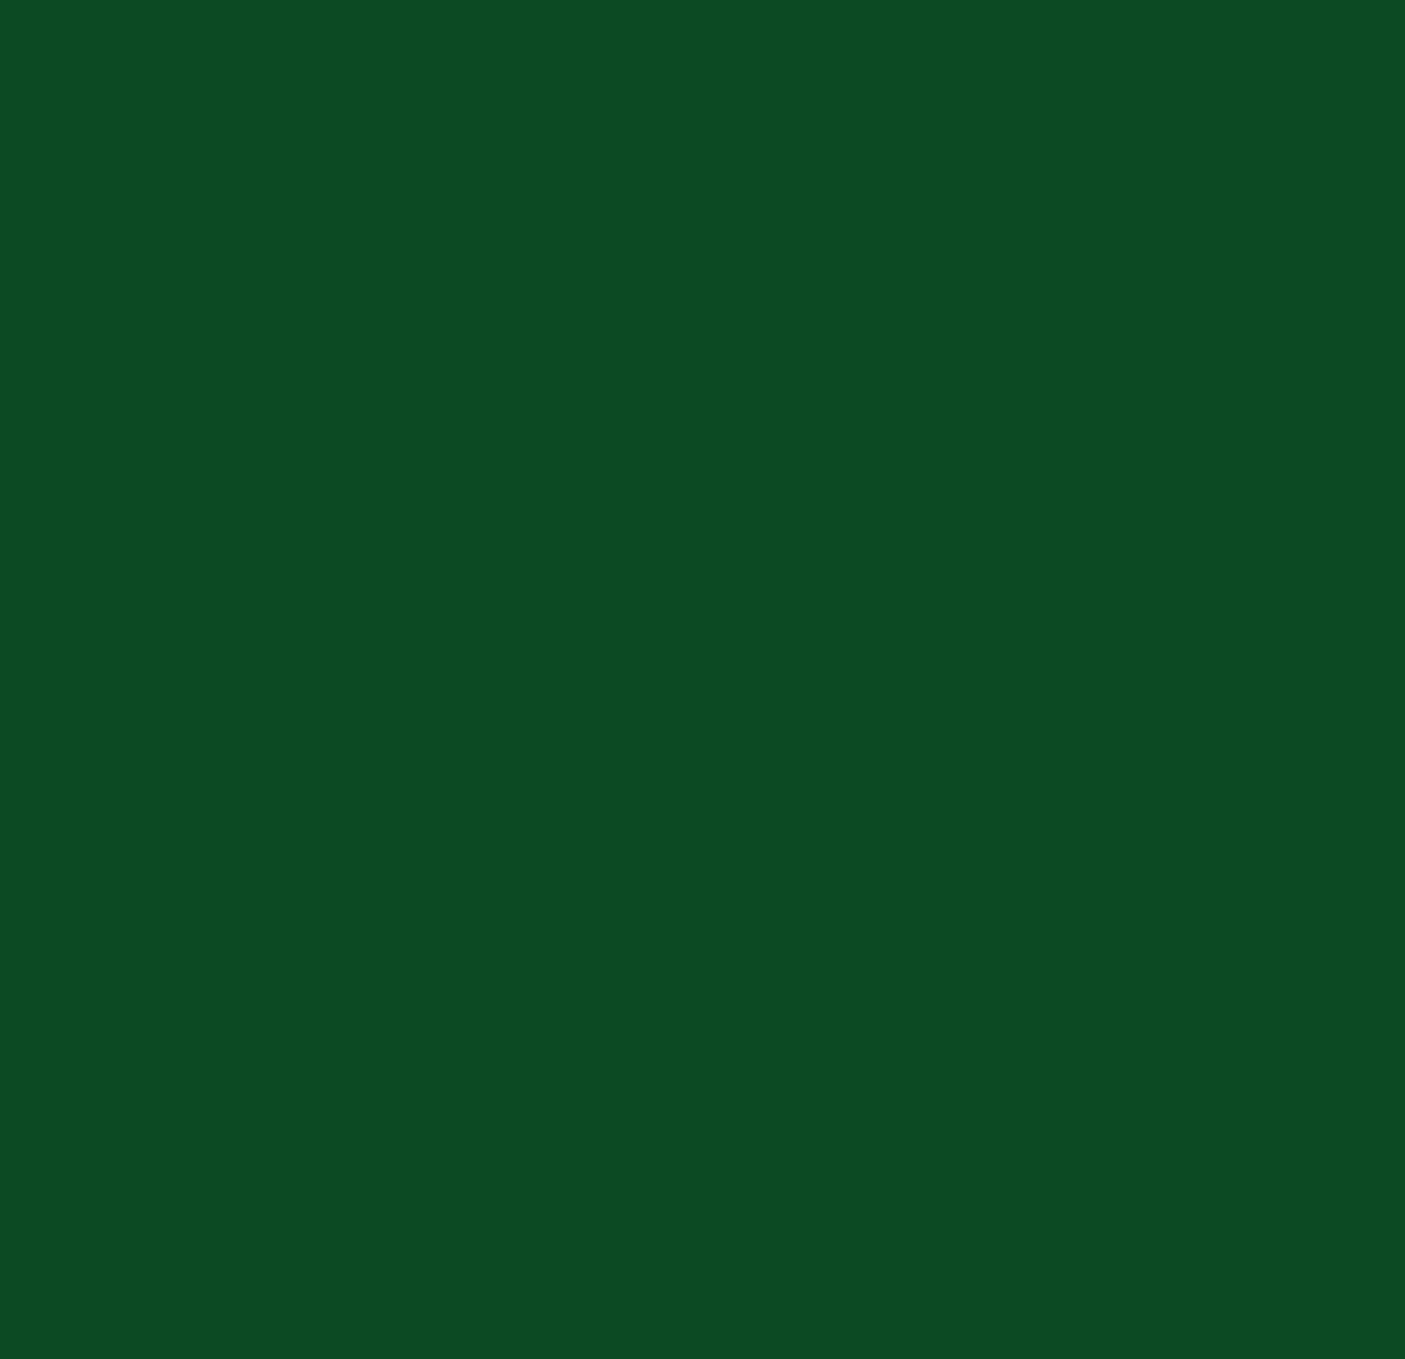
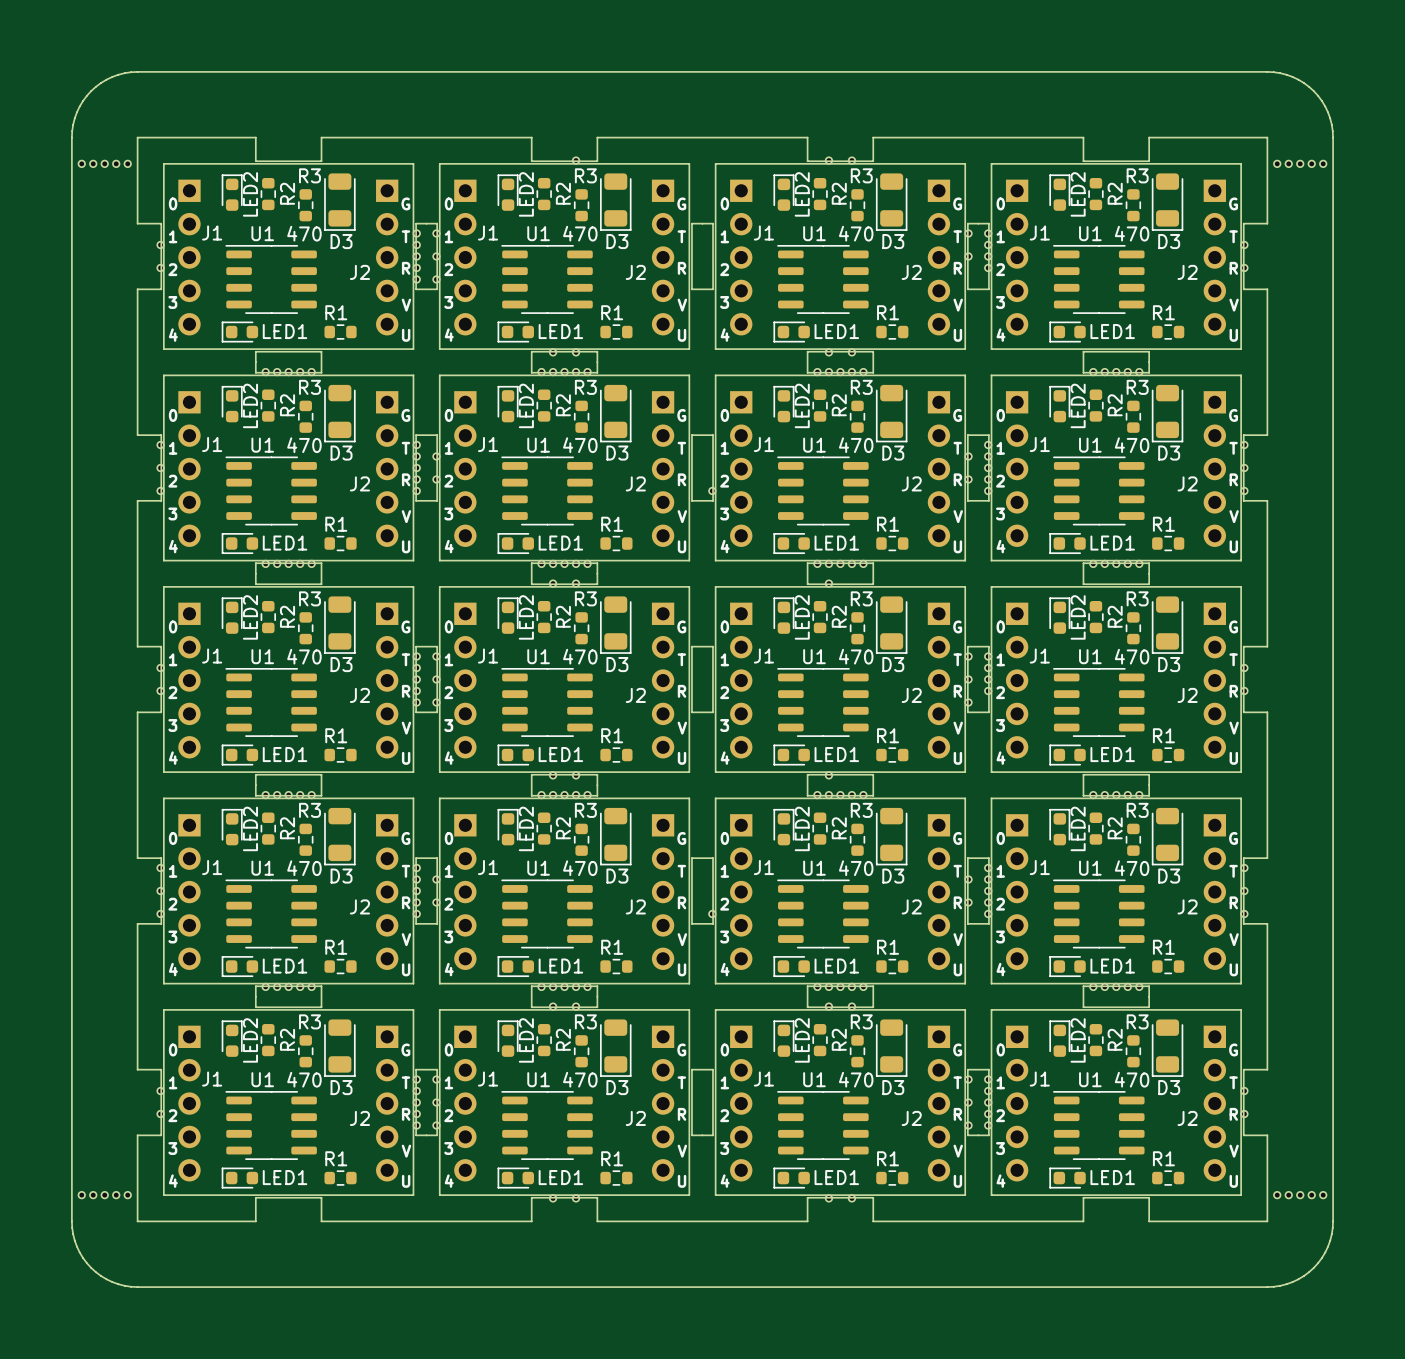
board edge: none -> (137, 71) (1267, 71) (1292, 76) (1313, 91) (1328, 112) (1333, 137) (1333, 1221) (1328, 1246) (1313, 1267) (1292, 1282) (1267, 1287) (137, 1287) (112, 1282) (91, 1267) (76, 1246) (71, 1221) (71, 137) (76, 112) (91, 91) (112, 76) (137, 71)
board edge: none -> (137, 137) (137, 223) (161, 223) (161, 289) (137, 289) (137, 435) (161, 435) (161, 500) (137, 500) (137, 646) (161, 646) (161, 712) (137, 712) (137, 858) (161, 858) (161, 923) (137, 923) (137, 1069) (161, 1069) (161, 1135) (137, 1135) (137, 1221) (255, 1221) (255, 1197) (321, 1197) (321, 1221) (531, 1221) (531, 1197) (597, 1197) (597, 1221) (807, 1221) (807, 1197) (873, 1197) (873, 1221) (1083, 1221) (1083, 1197) (1149, 1197) (1149, 1221) (1267, 1221) (1267, 1135) (1243, 1135) (1243, 1069) (1267, 1069) (1267, 923) (1243, 923) (1243, 858) (1267, 858) (1267, 712) (1243, 712) (1243, 646) (1267, 646) (1267, 500) (1243, 500) (1243, 435) (1267, 435) (1267, 289) (1243, 289) (1243, 223) (1267, 223) (1267, 137) (1149, 137) (1149, 161) (1083, 161) (1083, 137) (873, 137) (873, 161) (807, 161) (807, 137) (597, 137) (597, 161) (531, 161) (531, 137) (321, 137) (321, 161) (255, 161) (255, 137) (137, 137)
part: none -> (576, 160)
part: none -> (828, 160)
part: none -> (851, 160)
part: none -> (81, 163)
part: none -> (93, 163)
part: none -> (104, 163)
part: none -> (116, 163)
part: none -> (127, 163)
board edge: none -> (163, 163) (413, 163) (413, 349) (163, 349) (163, 163)
board edge: none -> (439, 163) (439, 349) (689, 349) (689, 163) (439, 163)
board edge: none -> (715, 163) (965, 163) (965, 349) (715, 349) (715, 163)
board edge: none -> (991, 163) (991, 349) (1241, 349) (1241, 163) (991, 163)
part: none -> (1277, 163)
part: none -> (1288, 163)
part: none -> (1300, 163)
part: none -> (1311, 163)
part: none -> (1323, 163)
LED2: none -> (232, 192)
LED2: none -> (508, 192)
LED2: none -> (783, 192)
LED2: none -> (1059, 192)
R2: none -> (268, 194)
R2: none -> (544, 194)
R2: none -> (820, 194)
R2: none -> (1095, 194)
D3: none -> (339, 202)
D3: none -> (615, 202)
D3: none -> (891, 202)
D3: none -> (1167, 202)
text: none -> 0 (173, 203)
text: none -> G (405, 203)
text: none -> 0 (448, 203)
text: none -> G (681, 203)
text: none -> 0 (724, 203)
text: none -> G (957, 203)
text: none -> 0 (1000, 203)
text: none -> G (1233, 203)
470: none -> R3 (305, 205)
470: none -> R3 (581, 205)
470: none -> R3 (857, 205)
470: none -> R3 (1133, 205)
board edge: none -> (416, 223) (437, 223) (437, 289) (416, 289) (416, 223)
board edge: none -> (691, 223) (713, 223) (713, 289) (691, 289) (691, 223)
board edge: none -> (967, 223) (988, 223) (988, 289) (967, 289) (967, 223)
part: none -> (416, 233)
part: none -> (436, 233)
part: none -> (968, 233)
part: none -> (988, 233)
text: none -> 1 (173, 236)
text: none -> T (405, 236)
text: none -> 1 (448, 236)
text: none -> T (681, 236)
text: none -> 1 (724, 236)
text: none -> T (957, 236)
text: none -> 1 (1000, 236)
text: none -> T (1233, 236)
part: none -> (160, 244)
part: none -> (416, 244)
part: none -> (988, 244)
part: none -> (1244, 244)
part: none -> (416, 256)
part: none -> (436, 256)
part: none -> (968, 256)
part: none -> (988, 256)
J1: none -> (189, 257)
J2: none -> (387, 257)
J1: none -> (465, 257)
J2: none -> (663, 257)
J1: none -> (741, 257)
J2: none -> (938, 257)
J1: none -> (1017, 257)
J2: none -> (1214, 257)
part: none -> (160, 267)
part: none -> (416, 267)
part: none -> (988, 267)
part: none -> (1244, 267)
text: none -> R (406, 268)
text: none -> R (682, 268)
text: none -> R (957, 268)
text: none -> R (1233, 268)
text: none -> 2 (172, 269)
text: none -> 2 (448, 269)
text: none -> 2 (724, 269)
text: none -> 2 (1000, 269)
U1: none -> (271, 279)
part: none -> (416, 279)
part: none -> (436, 279)
U1: none -> (547, 279)
U1: none -> (822, 279)
U1: none -> (1098, 279)
text: none -> 3 (172, 302)
text: none -> 3 (448, 302)
text: none -> 3 (724, 302)
text: none -> 3 (1000, 302)
text: none -> V (406, 305)
text: none -> V (682, 305)
text: none -> V (958, 305)
text: none -> V (1234, 305)
LED1: none -> (239, 332)
R1: none -> (340, 332)
LED1: none -> (515, 332)
R1: none -> (616, 332)
LED1: none -> (791, 332)
R1: none -> (892, 332)
LED1: none -> (1067, 332)
R1: none -> (1168, 332)
text: none -> 4 (173, 335)
text: none -> U (406, 335)
text: none -> 4 (449, 335)
text: none -> U (682, 335)
text: none -> 4 (725, 335)
text: none -> U (957, 335)
text: none -> 4 (1001, 335)
text: none -> U (1233, 335)
board edge: none -> (255, 351) (255, 372) (321, 372) (321, 351) (255, 351)
board edge: none -> (531, 351) (531, 372) (597, 372) (597, 351) (531, 351)
board edge: none -> (807, 351) (807, 372) (873, 372) (873, 351) (807, 351)
board edge: none -> (1083, 351) (1083, 372) (1149, 372) (1149, 351) (1083, 351)
part: none -> (553, 352)
part: none -> (576, 352)
part: none -> (828, 352)
part: none -> (851, 352)
part: none -> (265, 372)
part: none -> (277, 372)
part: none -> (288, 372)
part: none -> (300, 372)
part: none -> (311, 372)
part: none -> (541, 372)
part: none -> (553, 372)
part: none -> (564, 372)
part: none -> (576, 372)
part: none -> (587, 372)
part: none -> (817, 372)
part: none -> (828, 372)
part: none -> (840, 372)
part: none -> (851, 372)
part: none -> (863, 372)
part: none -> (1093, 372)
part: none -> (1104, 372)
part: none -> (1116, 372)
part: none -> (1127, 372)
part: none -> (1139, 372)
board edge: none -> (163, 375) (413, 375) (413, 560) (163, 560) (163, 375)
board edge: none -> (439, 375) (439, 560) (689, 560) (689, 375) (439, 375)
board edge: none -> (715, 375) (965, 375) (965, 560) (715, 560) (715, 375)
board edge: none -> (991, 375) (991, 560) (1241, 560) (1241, 375) (991, 375)
LED2: none -> (232, 404)
LED2: none -> (508, 404)
LED2: none -> (783, 404)
LED2: none -> (1059, 404)
R2: none -> (268, 405)
R2: none -> (544, 405)
R2: none -> (820, 405)
R2: none -> (1095, 405)
D3: none -> (339, 413)
D3: none -> (615, 413)
D3: none -> (891, 413)
D3: none -> (1167, 413)
text: none -> 0 (173, 415)
text: none -> G (405, 415)
text: none -> 0 (448, 415)
text: none -> G (681, 415)
text: none -> 0 (724, 415)
text: none -> G (957, 415)
text: none -> 0 (1000, 415)
text: none -> G (1233, 415)
470: none -> R3 (305, 416)
470: none -> R3 (581, 416)
470: none -> R3 (857, 416)
470: none -> R3 (1133, 416)
board edge: none -> (416, 435) (416, 500) (437, 500) (437, 435) (416, 435)
board edge: none -> (691, 435) (691, 500) (713, 500) (713, 435) (691, 435)
board edge: none -> (967, 435) (988, 435) (988, 500) (967, 500) (967, 435)
part: none -> (160, 444)
part: none -> (416, 444)
part: none -> (988, 444)
part: none -> (1244, 444)
text: none -> 1 (173, 448)
text: none -> T (405, 448)
text: none -> 1 (448, 448)
text: none -> T (681, 448)
text: none -> 1 (724, 448)
text: none -> T (957, 448)
text: none -> 1 (1000, 448)
text: none -> T (1233, 448)
part: none -> (416, 456)
part: none -> (436, 456)
part: none -> (968, 456)
part: none -> (988, 456)
part: none -> (160, 467)
part: none -> (416, 467)
part: none -> (988, 467)
part: none -> (1244, 467)
J1: none -> (189, 469)
J2: none -> (387, 469)
J1: none -> (465, 469)
J2: none -> (663, 469)
J1: none -> (741, 469)
J2: none -> (938, 469)
J1: none -> (1017, 469)
J2: none -> (1214, 469)
text: none -> R (406, 479)
part: none -> (416, 479)
part: none -> (436, 479)
text: none -> R (682, 479)
text: none -> R (957, 479)
part: none -> (968, 479)
part: none -> (988, 479)
text: none -> R (1233, 479)
text: none -> 2 (172, 481)
text: none -> 2 (448, 481)
text: none -> 2 (724, 481)
text: none -> 2 (1000, 481)
part: none -> (160, 490)
U1: none -> (271, 490)
part: none -> (416, 490)
U1: none -> (547, 490)
part: none -> (712, 490)
U1: none -> (822, 490)
part: none -> (988, 490)
U1: none -> (1098, 490)
part: none -> (1244, 490)
text: none -> 3 (172, 513)
text: none -> 3 (448, 513)
text: none -> 3 (724, 513)
text: none -> 3 (1000, 513)
text: none -> V (406, 516)
text: none -> V (682, 516)
text: none -> V (958, 516)
text: none -> V (1234, 516)
LED1: none -> (239, 543)
R1: none -> (340, 543)
LED1: none -> (515, 543)
R1: none -> (616, 543)
LED1: none -> (791, 543)
R1: none -> (892, 543)
LED1: none -> (1067, 543)
R1: none -> (1168, 543)
text: none -> 4 (173, 546)
text: none -> U (406, 546)
text: none -> 4 (449, 546)
text: none -> U (682, 546)
text: none -> 4 (725, 546)
text: none -> U (957, 546)
text: none -> 4 (1001, 546)
text: none -> U (1233, 546)
board edge: none -> (255, 563) (255, 584) (321, 584) (321, 563) (255, 563)
part: none -> (265, 563)
part: none -> (277, 563)
part: none -> (288, 563)
part: none -> (300, 563)
part: none -> (311, 563)
board edge: none -> (531, 563) (531, 584) (597, 584) (597, 563) (531, 563)
part: none -> (541, 563)
part: none -> (553, 563)
part: none -> (564, 563)
part: none -> (576, 563)
part: none -> (587, 563)
board edge: none -> (807, 563) (807, 584) (873, 584) (873, 563) (807, 563)
part: none -> (817, 563)
part: none -> (828, 563)
part: none -> (840, 563)
part: none -> (851, 563)
part: none -> (863, 563)
board edge: none -> (1083, 563) (1083, 584) (1149, 584) (1149, 563) (1083, 563)
part: none -> (1093, 563)
part: none -> (1104, 563)
part: none -> (1116, 563)
part: none -> (1127, 563)
part: none -> (1139, 563)
part: none -> (553, 583)
part: none -> (576, 583)
part: none -> (828, 583)
board edge: none -> (163, 586) (413, 586) (413, 772) (163, 772) (163, 586)
board edge: none -> (439, 586) (689, 586) (689, 772) (439, 772) (439, 586)
board edge: none -> (715, 586) (965, 586) (965, 772) (715, 772) (715, 586)
board edge: none -> (991, 586) (1241, 586) (1241, 772) (991, 772) (991, 586)
LED2: none -> (232, 615)
LED2: none -> (508, 615)
LED2: none -> (783, 615)
LED2: none -> (1059, 615)
R2: none -> (268, 617)
R2: none -> (544, 617)
R2: none -> (820, 617)
R2: none -> (1095, 617)
D3: none -> (339, 625)
D3: none -> (615, 625)
D3: none -> (891, 625)
D3: none -> (1167, 625)
text: none -> 0 (173, 626)
text: none -> G (405, 626)
text: none -> 0 (448, 626)
text: none -> G (681, 626)
text: none -> 0 (724, 626)
text: none -> G (957, 626)
text: none -> 0 (1000, 626)
text: none -> G (1233, 626)
470: none -> R3 (305, 628)
470: none -> R3 (581, 628)
470: none -> R3 (857, 628)
470: none -> R3 (1133, 628)
board edge: none -> (416, 646) (437, 646) (437, 712) (416, 712) (416, 646)
board edge: none -> (691, 646) (691, 712) (712, 712) (712, 646) (691, 646)
board edge: none -> (967, 646) (988, 646) (988, 712) (967, 712) (967, 646)
part: none -> (416, 656)
part: none -> (436, 656)
part: none -> (968, 656)
part: none -> (988, 656)
text: none -> 1 (173, 659)
text: none -> T (405, 659)
text: none -> 1 (448, 659)
text: none -> T (681, 659)
text: none -> 1 (724, 659)
text: none -> T (957, 659)
text: none -> 1 (1000, 659)
text: none -> T (1233, 659)
part: none -> (160, 668)
part: none -> (416, 668)
part: none -> (988, 668)
part: none -> (1244, 668)
part: none -> (416, 679)
part: none -> (436, 679)
part: none -> (968, 679)
part: none -> (988, 679)
J1: none -> (189, 680)
J2: none -> (387, 680)
J1: none -> (465, 680)
J2: none -> (663, 680)
J1: none -> (741, 680)
J2: none -> (938, 680)
J1: none -> (1017, 680)
J2: none -> (1214, 680)
part: none -> (160, 690)
part: none -> (416, 690)
part: none -> (988, 690)
part: none -> (1244, 690)
text: none -> R (406, 691)
text: none -> R (682, 691)
text: none -> R (957, 691)
text: none -> R (1233, 691)
text: none -> 2 (172, 692)
text: none -> 2 (448, 692)
text: none -> 2 (724, 692)
text: none -> 2 (1000, 692)
U1: none -> (271, 702)
part: none -> (416, 702)
part: none -> (436, 702)
U1: none -> (547, 702)
U1: none -> (822, 702)
part: none -> (968, 702)
U1: none -> (1098, 702)
text: none -> 3 (172, 725)
text: none -> 3 (448, 725)
text: none -> 3 (724, 725)
text: none -> 3 (1000, 725)
text: none -> V (406, 728)
text: none -> V (682, 728)
text: none -> V (958, 728)
text: none -> V (1234, 728)
LED1: none -> (239, 755)
R1: none -> (340, 755)
LED1: none -> (515, 755)
R1: none -> (616, 755)
LED1: none -> (791, 755)
R1: none -> (892, 755)
LED1: none -> (1067, 755)
R1: none -> (1168, 755)
text: none -> 4 (173, 758)
text: none -> U (406, 758)
text: none -> 4 (449, 758)
text: none -> U (682, 758)
text: none -> 4 (725, 758)
text: none -> U (957, 758)
text: none -> 4 (1001, 758)
text: none -> U (1233, 758)
board edge: none -> (255, 774) (255, 795) (321, 795) (321, 774) (255, 774)
board edge: none -> (531, 774) (531, 795) (597, 795) (597, 774) (531, 774)
board edge: none -> (807, 774) (873, 774) (873, 795) (807, 795) (807, 774)
board edge: none -> (1083, 774) (1149, 774) (1149, 795) (1083, 795) (1083, 774)
part: none -> (553, 775)
part: none -> (576, 775)
part: none -> (828, 775)
part: none -> (265, 795)
part: none -> (277, 795)
part: none -> (288, 795)
part: none -> (300, 795)
part: none -> (311, 795)
part: none -> (541, 795)
part: none -> (553, 795)
part: none -> (564, 795)
part: none -> (576, 795)
part: none -> (587, 795)
part: none -> (817, 795)
part: none -> (828, 795)
part: none -> (840, 795)
part: none -> (851, 795)
part: none -> (863, 795)
part: none -> (1093, 795)
part: none -> (1104, 795)
part: none -> (1116, 795)
part: none -> (1127, 795)
part: none -> (1139, 795)
board edge: none -> (163, 798) (413, 798) (413, 983) (163, 983) (163, 798)
board edge: none -> (439, 798) (439, 983) (689, 983) (689, 798) (439, 798)
board edge: none -> (715, 798) (965, 798) (965, 983) (715, 983) (715, 798)
board edge: none -> (991, 798) (991, 983) (1241, 983) (1241, 798) (991, 798)
LED2: none -> (232, 827)
LED2: none -> (508, 827)
LED2: none -> (783, 827)
LED2: none -> (1059, 827)
R2: none -> (268, 828)
R2: none -> (544, 828)
R2: none -> (820, 828)
R2: none -> (1095, 828)
D3: none -> (339, 836)
D3: none -> (615, 836)
D3: none -> (891, 836)
D3: none -> (1167, 836)
text: none -> 0 (173, 838)
text: none -> G (405, 838)
text: none -> 0 (448, 838)
text: none -> G (681, 838)
text: none -> 0 (724, 838)
text: none -> G (957, 838)
text: none -> 0 (1000, 838)
text: none -> G (1233, 838)
470: none -> R3 (305, 839)
470: none -> R3 (581, 839)
470: none -> R3 (857, 839)
470: none -> R3 (1133, 839)
board edge: none -> (416, 858) (416, 923) (437, 923) (437, 858) (416, 858)
board edge: none -> (691, 858) (691, 923) (713, 923) (713, 858) (691, 858)
board edge: none -> (967, 858) (988, 858) (988, 923) (967, 923) (967, 858)
part: none -> (160, 868)
part: none -> (416, 868)
part: none -> (988, 868)
part: none -> (1244, 868)
text: none -> 1 (173, 871)
text: none -> T (405, 871)
text: none -> 1 (448, 871)
text: none -> T (681, 871)
text: none -> 1 (724, 871)
text: none -> T (957, 871)
text: none -> 1 (1000, 871)
text: none -> T (1233, 871)
part: none -> (416, 879)
part: none -> (436, 879)
part: none -> (968, 879)
part: none -> (988, 879)
part: none -> (160, 891)
part: none -> (416, 891)
part: none -> (988, 891)
part: none -> (1244, 891)
J1: none -> (189, 892)
J2: none -> (387, 892)
J1: none -> (465, 892)
J2: none -> (663, 892)
J1: none -> (741, 892)
J2: none -> (938, 892)
J1: none -> (1017, 892)
J2: none -> (1214, 892)
text: none -> R (406, 902)
part: none -> (416, 902)
part: none -> (436, 902)
text: none -> R (682, 902)
text: none -> R (957, 902)
part: none -> (968, 902)
part: none -> (988, 902)
text: none -> R (1233, 902)
text: none -> 2 (172, 904)
text: none -> 2 (448, 904)
text: none -> 2 (724, 904)
text: none -> 2 (1000, 904)
part: none -> (160, 913)
U1: none -> (271, 913)
part: none -> (416, 913)
U1: none -> (547, 913)
part: none -> (712, 913)
U1: none -> (822, 913)
part: none -> (988, 913)
U1: none -> (1098, 913)
part: none -> (1244, 913)
text: none -> 3 (172, 937)
text: none -> 3 (448, 937)
text: none -> 3 (724, 937)
text: none -> 3 (1000, 937)
text: none -> V (406, 939)
text: none -> V (682, 939)
text: none -> V (958, 939)
text: none -> V (1234, 939)
LED1: none -> (239, 966)
R1: none -> (340, 966)
LED1: none -> (515, 966)
R1: none -> (616, 966)
LED1: none -> (791, 966)
R1: none -> (892, 966)
LED1: none -> (1067, 966)
R1: none -> (1168, 966)
text: none -> 4 (173, 969)
text: none -> U (406, 969)
text: none -> 4 (449, 969)
text: none -> U (682, 969)
text: none -> 4 (725, 969)
text: none -> U (957, 969)
text: none -> 4 (1001, 969)
text: none -> U (1233, 969)
board edge: none -> (255, 986) (255, 1007) (321, 1007) (321, 986) (255, 986)
part: none -> (265, 986)
part: none -> (277, 986)
part: none -> (288, 986)
part: none -> (300, 986)
part: none -> (311, 986)
board edge: none -> (531, 986) (531, 1007) (597, 1007) (597, 986) (531, 986)
part: none -> (541, 986)
part: none -> (553, 986)
part: none -> (564, 986)
part: none -> (576, 986)
part: none -> (587, 986)
board edge: none -> (807, 986) (807, 1007) (873, 1007) (873, 986) (807, 986)
part: none -> (817, 986)
part: none -> (828, 986)
part: none -> (840, 986)
part: none -> (851, 986)
part: none -> (863, 986)
board edge: none -> (1083, 986) (1083, 1007) (1149, 1007) (1149, 986) (1083, 986)
part: none -> (1093, 986)
part: none -> (1104, 986)
part: none -> (1116, 986)
part: none -> (1127, 986)
part: none -> (1139, 986)
part: none -> (553, 1006)
part: none -> (576, 1006)
part: none -> (828, 1006)
part: none -> (851, 1006)
board edge: none -> (163, 1009) (413, 1009) (413, 1195) (163, 1195) (163, 1009)
board edge: none -> (439, 1009) (439, 1195) (689, 1195) (689, 1009) (439, 1009)
board edge: none -> (715, 1009) (965, 1009) (965, 1195) (715, 1195) (715, 1009)
board edge: none -> (991, 1009) (991, 1195) (1241, 1195) (1241, 1009) (991, 1009)
LED2: none -> (232, 1038)
LED2: none -> (508, 1038)
LED2: none -> (783, 1038)
LED2: none -> (1059, 1038)
R2: none -> (268, 1040)
R2: none -> (544, 1040)
R2: none -> (820, 1040)
R2: none -> (1095, 1040)
D3: none -> (339, 1048)
D3: none -> (615, 1048)
D3: none -> (891, 1048)
D3: none -> (1167, 1048)
text: none -> 0 (173, 1049)
text: none -> G (405, 1049)
text: none -> 0 (448, 1049)
text: none -> G (681, 1049)
text: none -> 0 (724, 1049)
text: none -> G (957, 1049)
text: none -> 0 (1000, 1049)
text: none -> G (1233, 1049)
470: none -> R3 (305, 1051)
470: none -> R3 (581, 1051)
470: none -> R3 (857, 1051)
470: none -> R3 (1133, 1051)
board edge: none -> (416, 1069) (416, 1135) (437, 1135) (437, 1069) (416, 1069)
board edge: none -> (691, 1069) (691, 1135) (712, 1135) (712, 1069) (691, 1069)
board edge: none -> (967, 1069) (967, 1135) (988, 1135) (988, 1069) (967, 1069)
part: none -> (416, 1079)
part: none -> (436, 1079)
part: none -> (968, 1079)
part: none -> (988, 1079)
text: none -> 1 (173, 1082)
text: none -> T (405, 1082)
text: none -> 1 (448, 1082)
text: none -> T (681, 1082)
text: none -> 1 (724, 1082)
text: none -> T (957, 1082)
text: none -> 1 (1000, 1082)
text: none -> T (1233, 1082)
part: none -> (160, 1091)
part: none -> (416, 1091)
part: none -> (988, 1091)
part: none -> (1244, 1091)
part: none -> (416, 1102)
part: none -> (436, 1102)
part: none -> (968, 1102)
part: none -> (988, 1102)
J1: none -> (189, 1103)
J2: none -> (387, 1103)
J1: none -> (465, 1103)
J2: none -> (663, 1103)
J1: none -> (741, 1103)
J2: none -> (938, 1103)
J1: none -> (1017, 1103)
J2: none -> (1214, 1103)
part: none -> (160, 1114)
text: none -> R (406, 1114)
part: none -> (416, 1114)
text: none -> R (682, 1114)
text: none -> R (957, 1114)
part: none -> (988, 1114)
text: none -> R (1233, 1114)
part: none -> (1244, 1114)
text: none -> 2 (172, 1115)
text: none -> 2 (448, 1115)
text: none -> 2 (724, 1115)
text: none -> 2 (1000, 1115)
U1: none -> (271, 1125)
part: none -> (416, 1125)
part: none -> (436, 1125)
U1: none -> (547, 1125)
U1: none -> (822, 1125)
part: none -> (968, 1125)
part: none -> (988, 1125)
U1: none -> (1098, 1125)
text: none -> 3 (172, 1148)
text: none -> 3 (448, 1148)
text: none -> 3 (724, 1148)
text: none -> 3 (1000, 1148)
text: none -> V (406, 1151)
text: none -> V (682, 1151)
text: none -> V (958, 1151)
text: none -> V (1234, 1151)
LED1: none -> (239, 1178)
R1: none -> (340, 1178)
LED1: none -> (515, 1178)
R1: none -> (616, 1178)
LED1: none -> (791, 1178)
R1: none -> (892, 1178)
LED1: none -> (1067, 1178)
R1: none -> (1168, 1178)
text: none -> 4 (173, 1181)
text: none -> U (406, 1181)
text: none -> 4 (449, 1181)
text: none -> U (682, 1181)
text: none -> 4 (725, 1181)
text: none -> U (957, 1181)
text: none -> 4 (1001, 1181)
text: none -> U (1233, 1181)
part: none -> (81, 1195)
part: none -> (93, 1195)
part: none -> (104, 1195)
part: none -> (116, 1195)
part: none -> (127, 1195)
part: none -> (1277, 1195)
part: none -> (1288, 1195)
part: none -> (1300, 1195)
part: none -> (1311, 1195)
part: none -> (1323, 1195)
part: none -> (553, 1198)
part: none -> (576, 1198)
part: none -> (828, 1198)
part: none -> (851, 1198)

